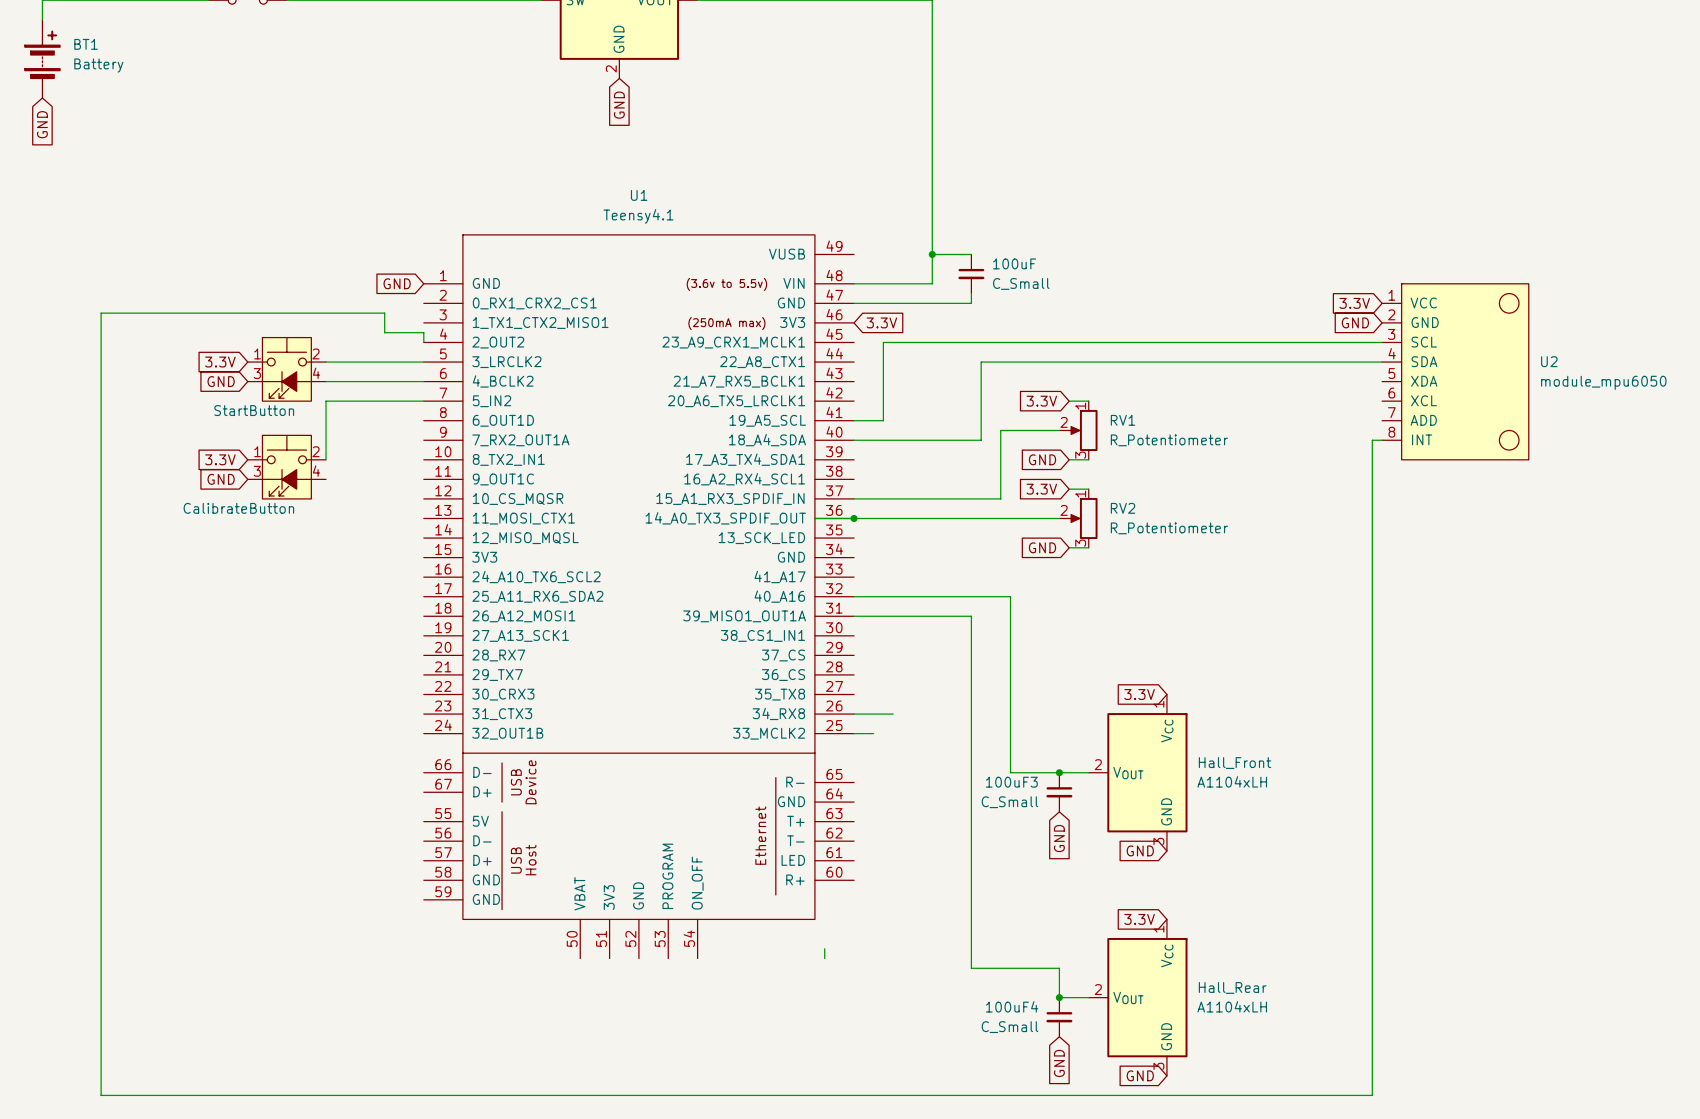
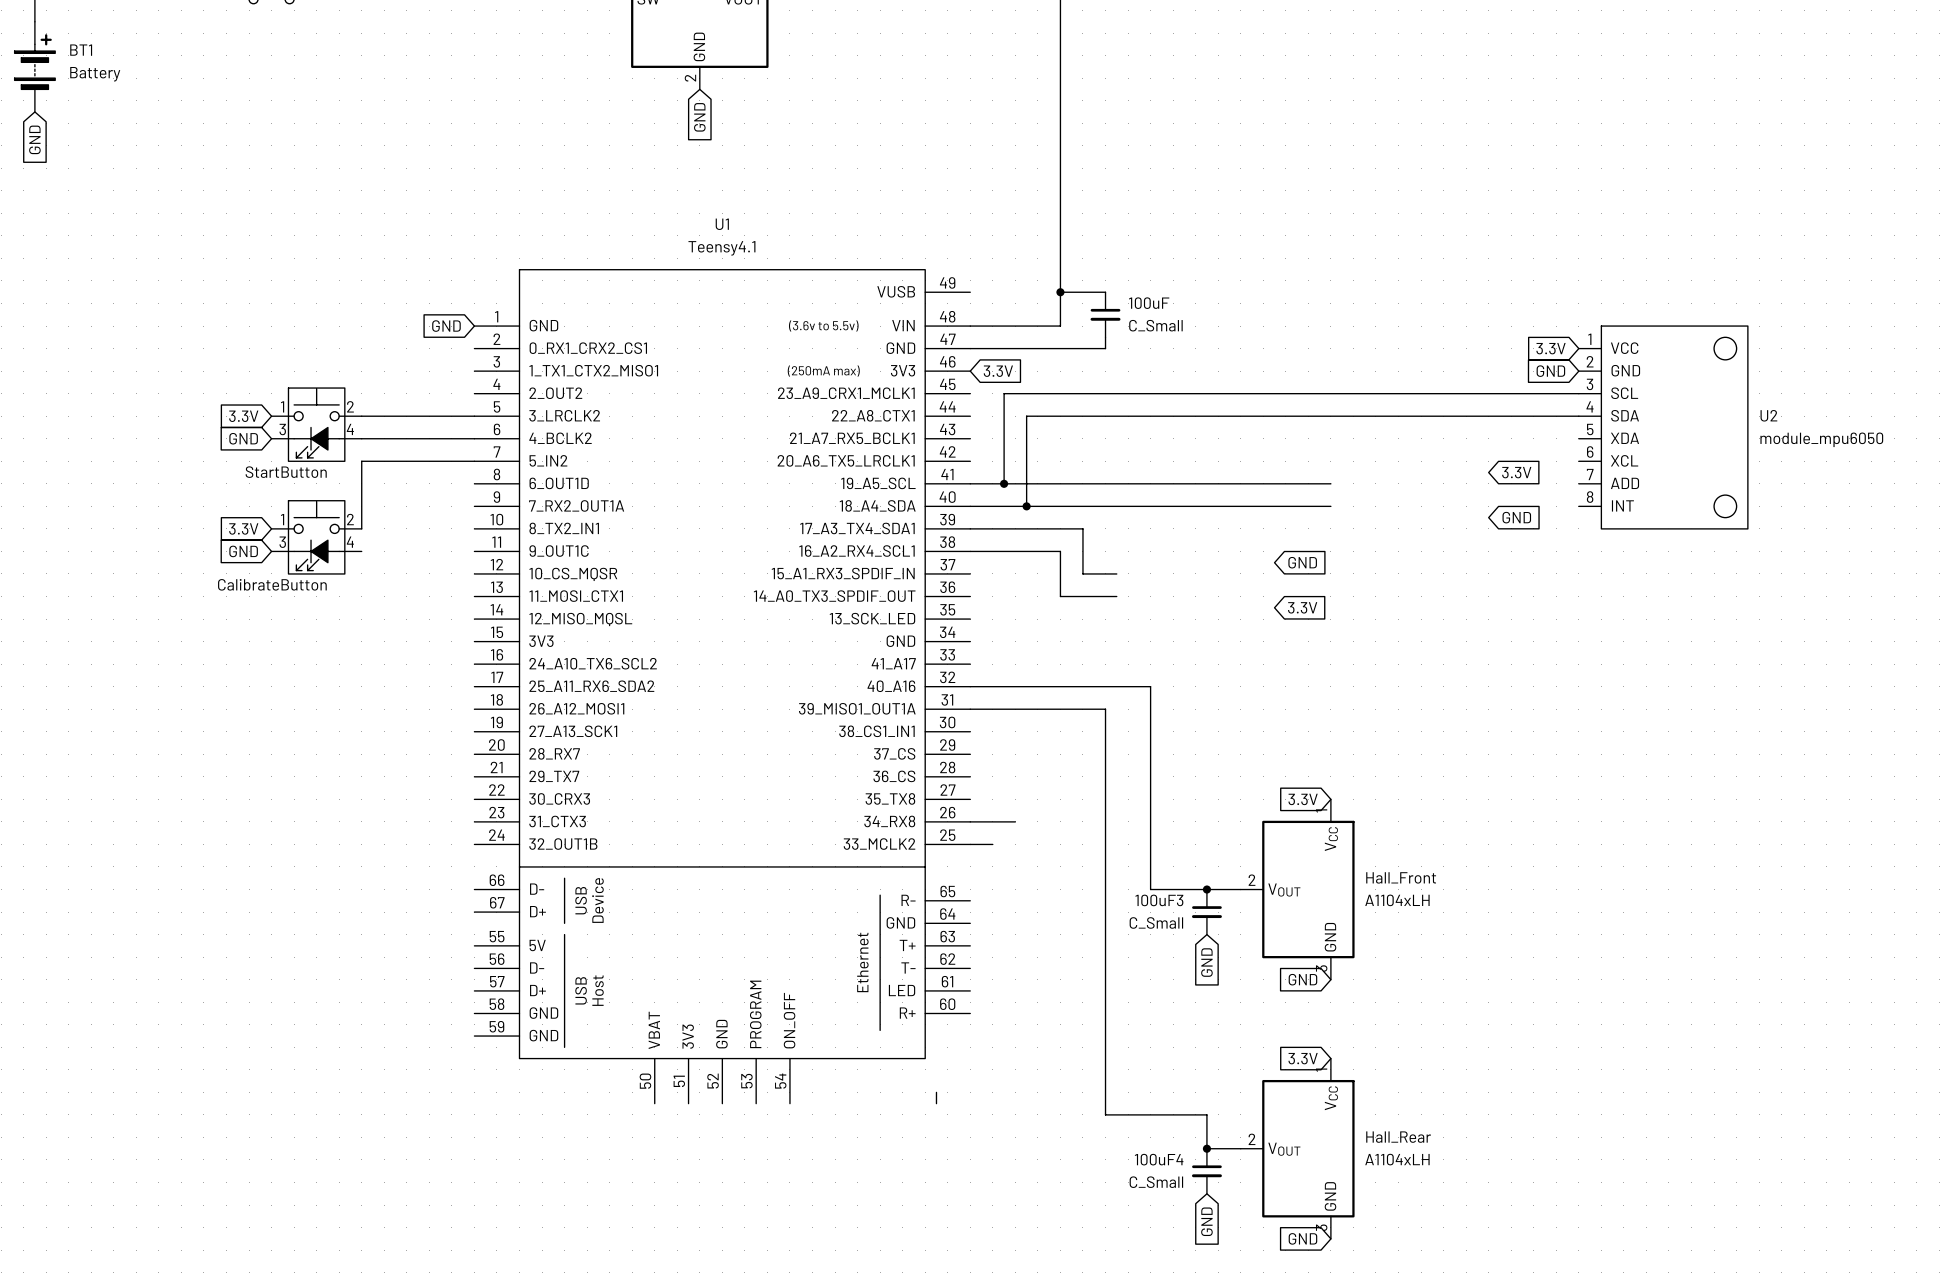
wire: (423, 342) (423, 332) (384, 332) (384, 313) (101, 313) (101, 1095) (1372, 1095) (1372, 440) (1382, 440) -> none
wire: (981, 362) (981, 440) -> (1116, 416) (1026, 416) (1026, 506)
global label: 3.3V (1041, 401) -> none
wire: (1069, 401) (1088, 401) -> none
global label: none -> 3.3V (1516, 472)
wire: none -> (1004, 483) (1330, 483)
junction: none -> (1004, 483)
wire: (1059, 430) (1000, 430) (1000, 498) (981, 498) -> none
RV1: R_Potentiometer (1078, 430) -> none
junction: none -> (1026, 506)
wire: none -> (1116, 506) (1330, 506)
global label: none -> GND (1516, 517)
global label: GND (1042, 459) -> none
wire: (1069, 459) (1088, 459) -> none
global label rotation: 0° (1041, 489) -> 180° (1302, 607)
global label position: 3.3V (1041, 489) -> 3.3V (1302, 607)
wire: (1069, 489) (1088, 489) -> none
global label: none -> GND (1302, 562)
wire: (854, 498) (951, 498) -> (970, 528) (1082, 528) (1082, 573)
wire: (814, 518) (932, 518) -> (970, 551) (1060, 551) (1060, 596)
junction: (854, 518) -> none
wire: (981, 518) (1059, 518) -> none
RV2: R_Potentiometer (1078, 518) -> none
global label: GND (1042, 547) -> none
wire: (1069, 547) (1088, 547) -> none

